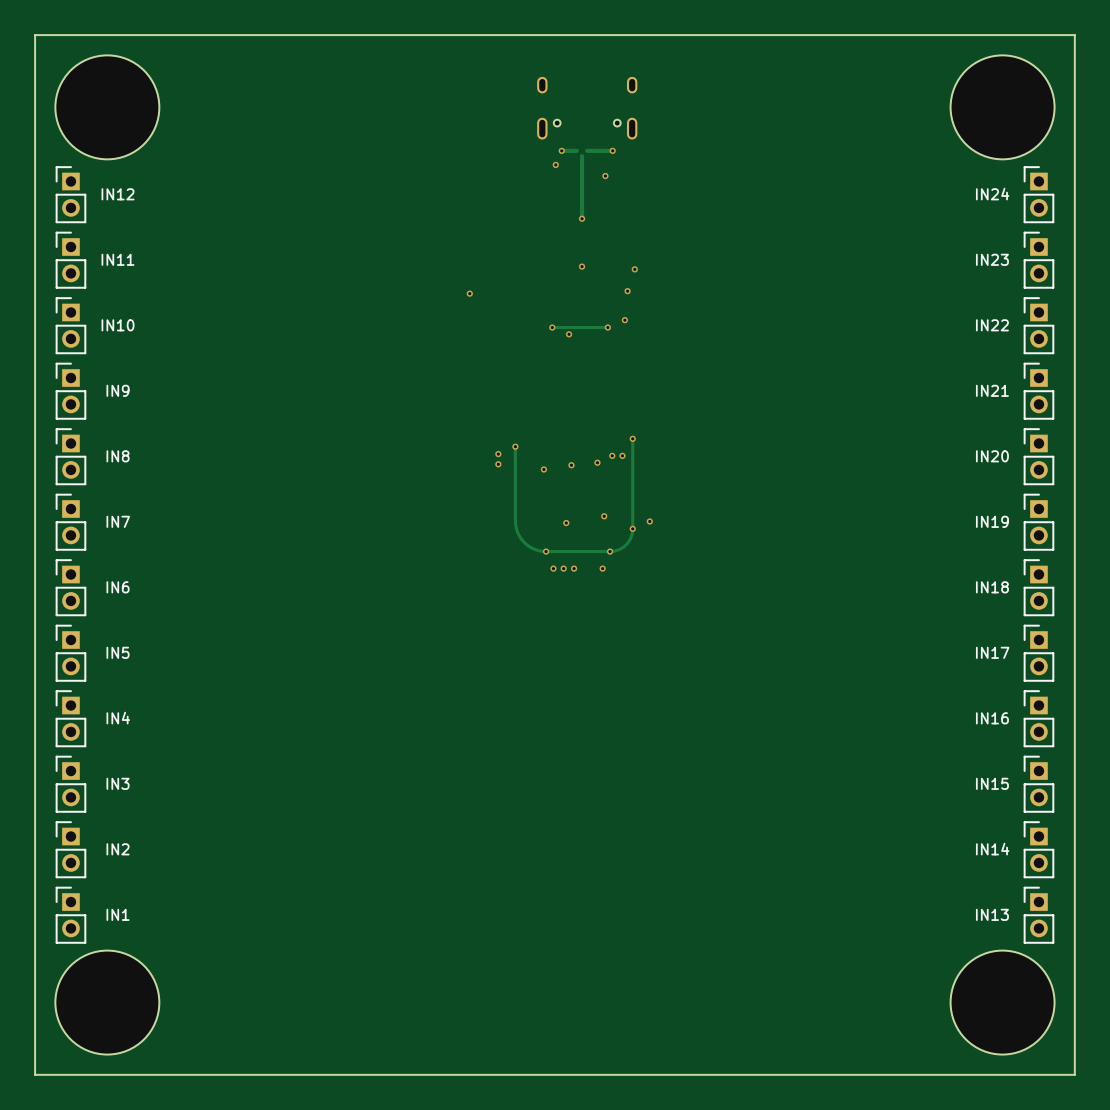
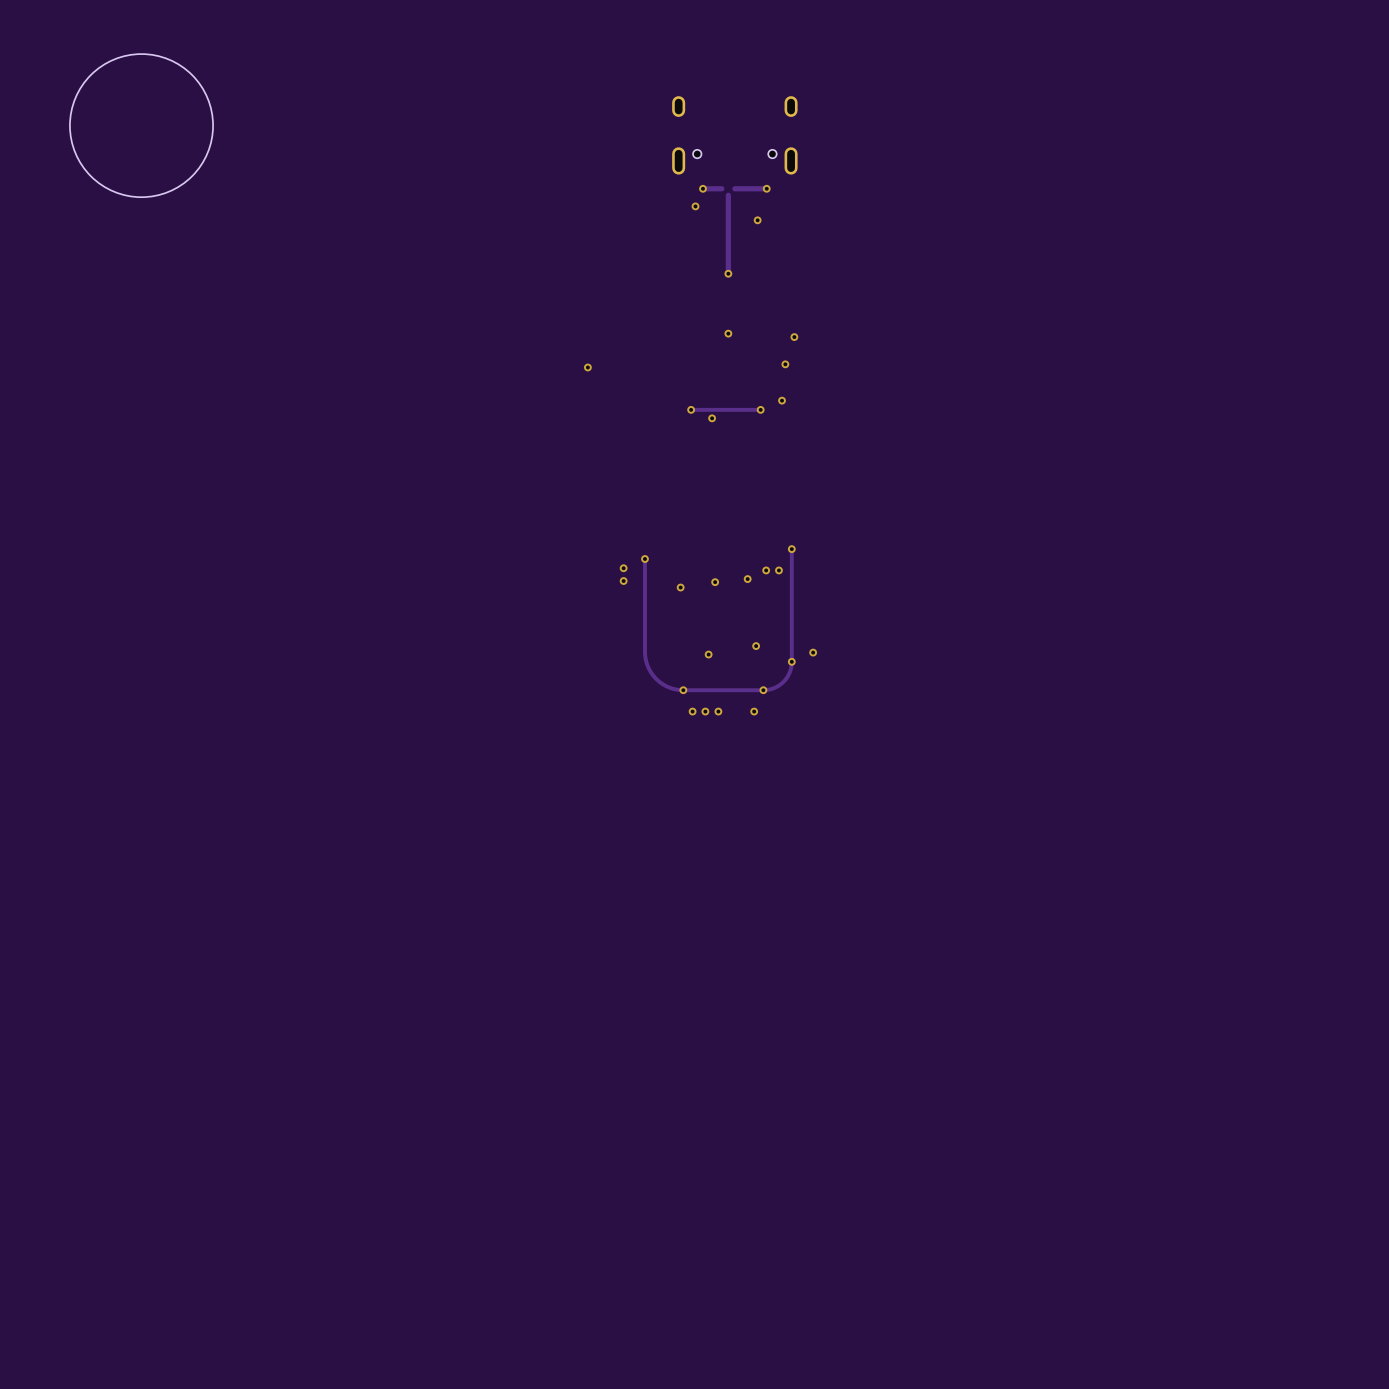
board edge: (35, 35) (1074, 35) (1074, 1074) (35, 1074) (35, 35) -> none
round board edge: none -> [69, 53, 214, 198]
part: (107, 107) -> none
part: (1002, 107) -> none
IN12: (70, 194) -> none
IN24: (1038, 194) -> none
IN11: (70, 260) -> none
IN23: (1038, 260) -> none
IN10: (70, 325) -> none
IN22: (1038, 325) -> none
IN9: (70, 391) -> none
IN21: (1038, 391) -> none
IN8: (70, 456) -> none
IN20: (1038, 456) -> none
IN7: (70, 522) -> none
IN19: (1038, 522) -> none
IN6: (70, 587) -> none
IN18: (1038, 587) -> none
IN5: (70, 653) -> none
IN17: (1038, 653) -> none
IN4: (70, 718) -> none
IN16: (1038, 718) -> none
IN3: (70, 784) -> none
IN15: (1038, 784) -> none
IN2: (70, 849) -> none
IN14: (1038, 849) -> none
IN1: (70, 915) -> none
IN13: (1038, 915) -> none
part: (107, 1002) -> none
part: (1002, 1002) -> none

